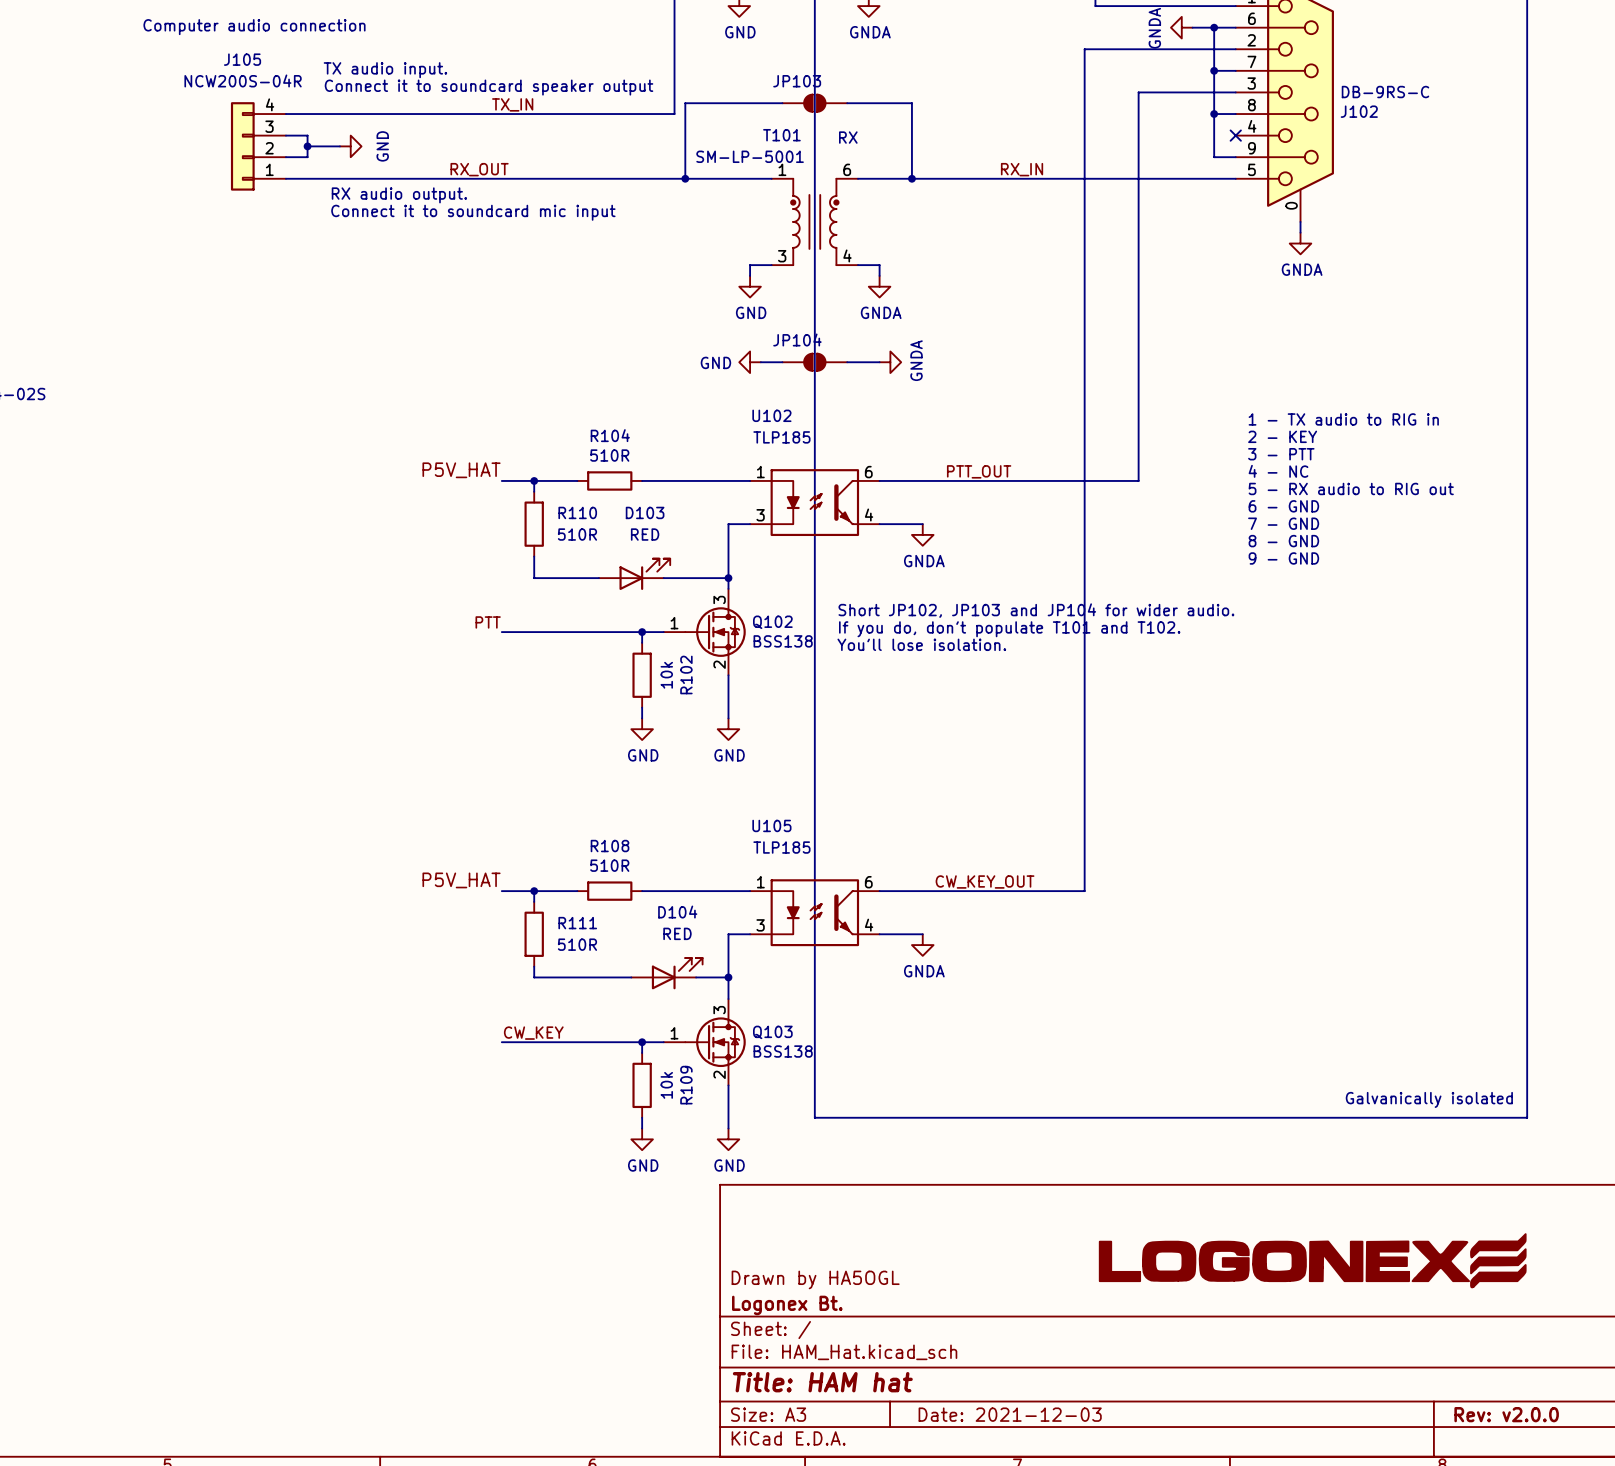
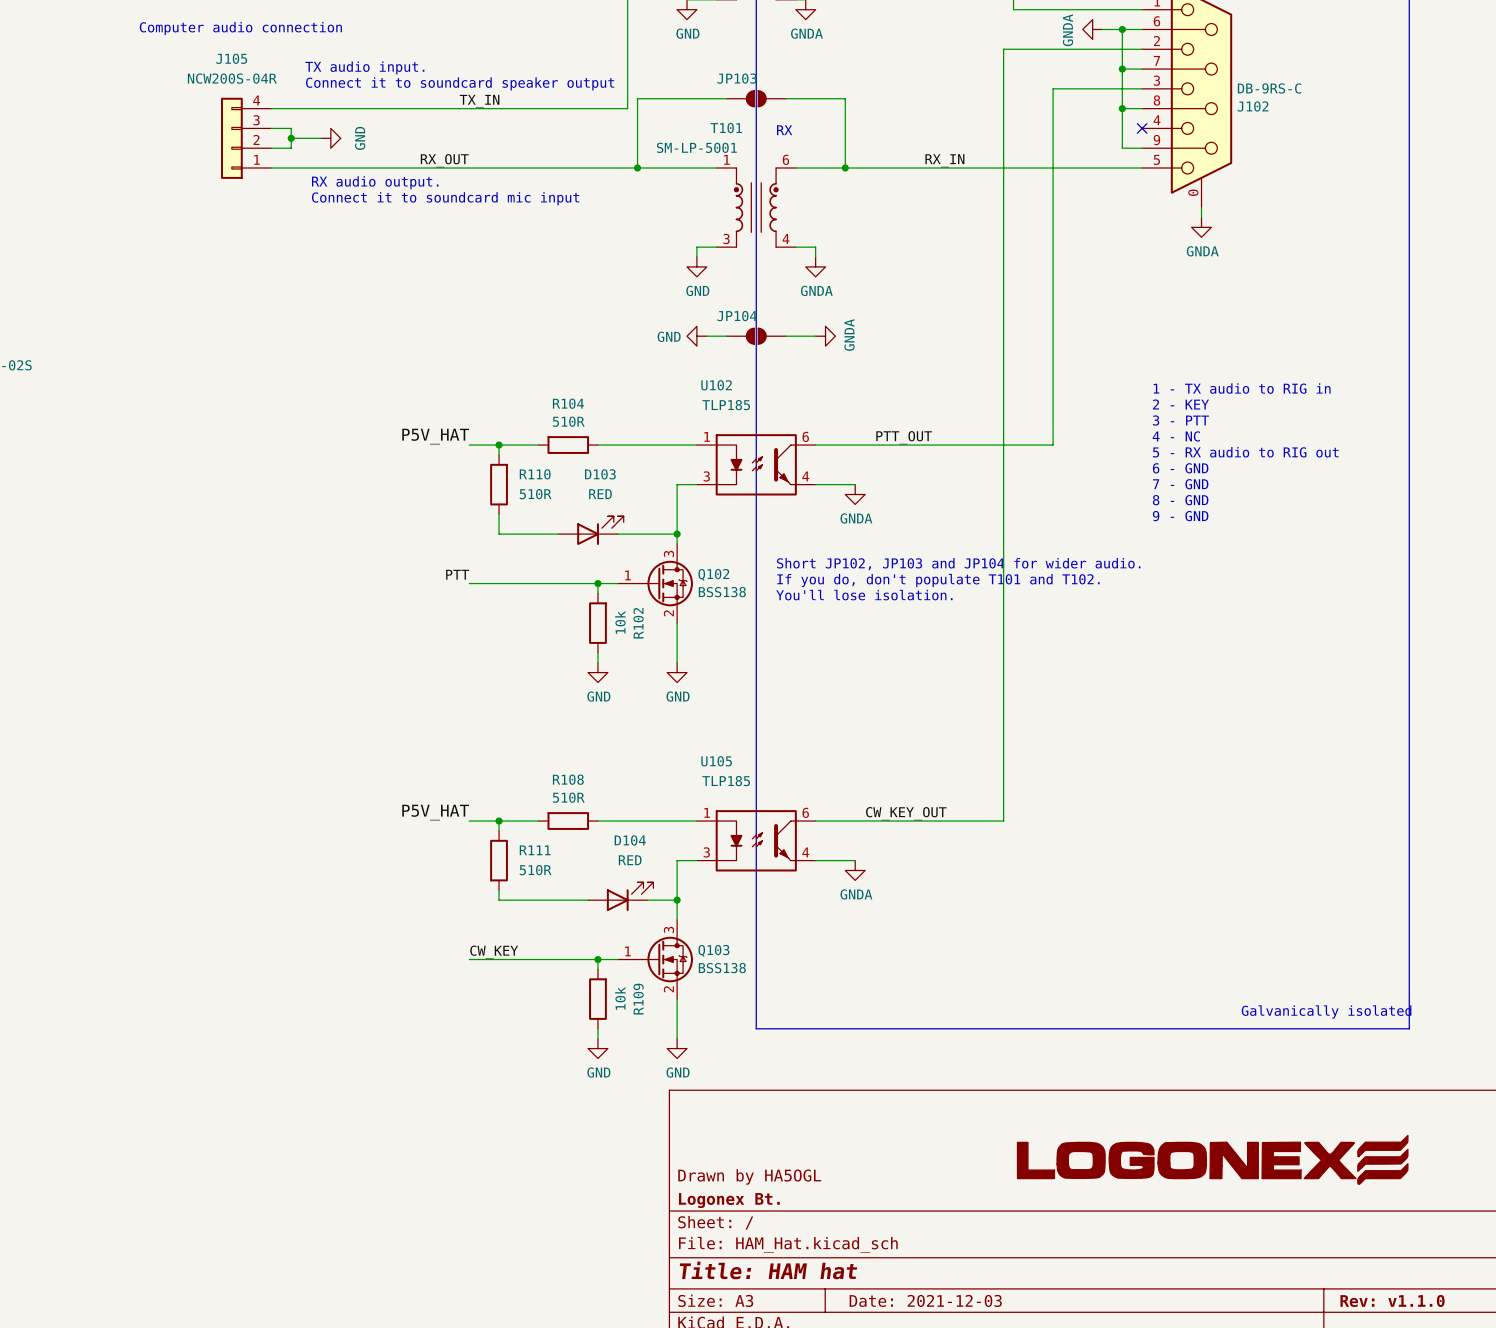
title block: Rev: v2.0.0 (1506, 1414) -> Rev: v1.1.0 (1392, 1300)

